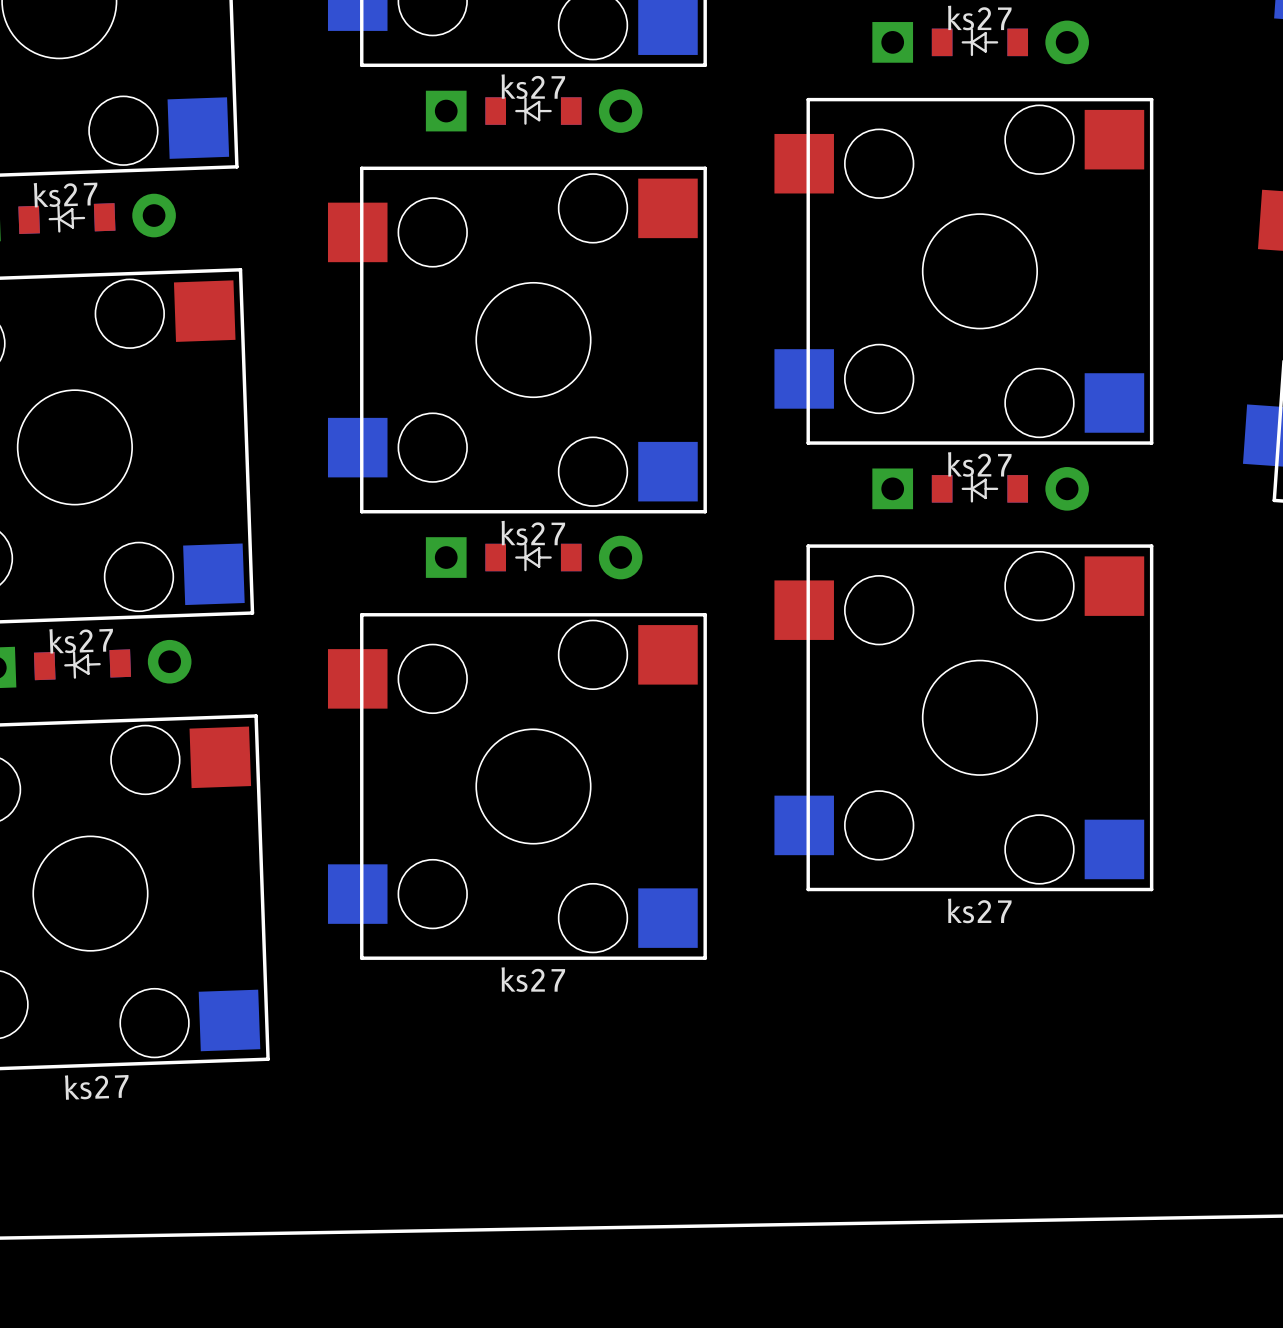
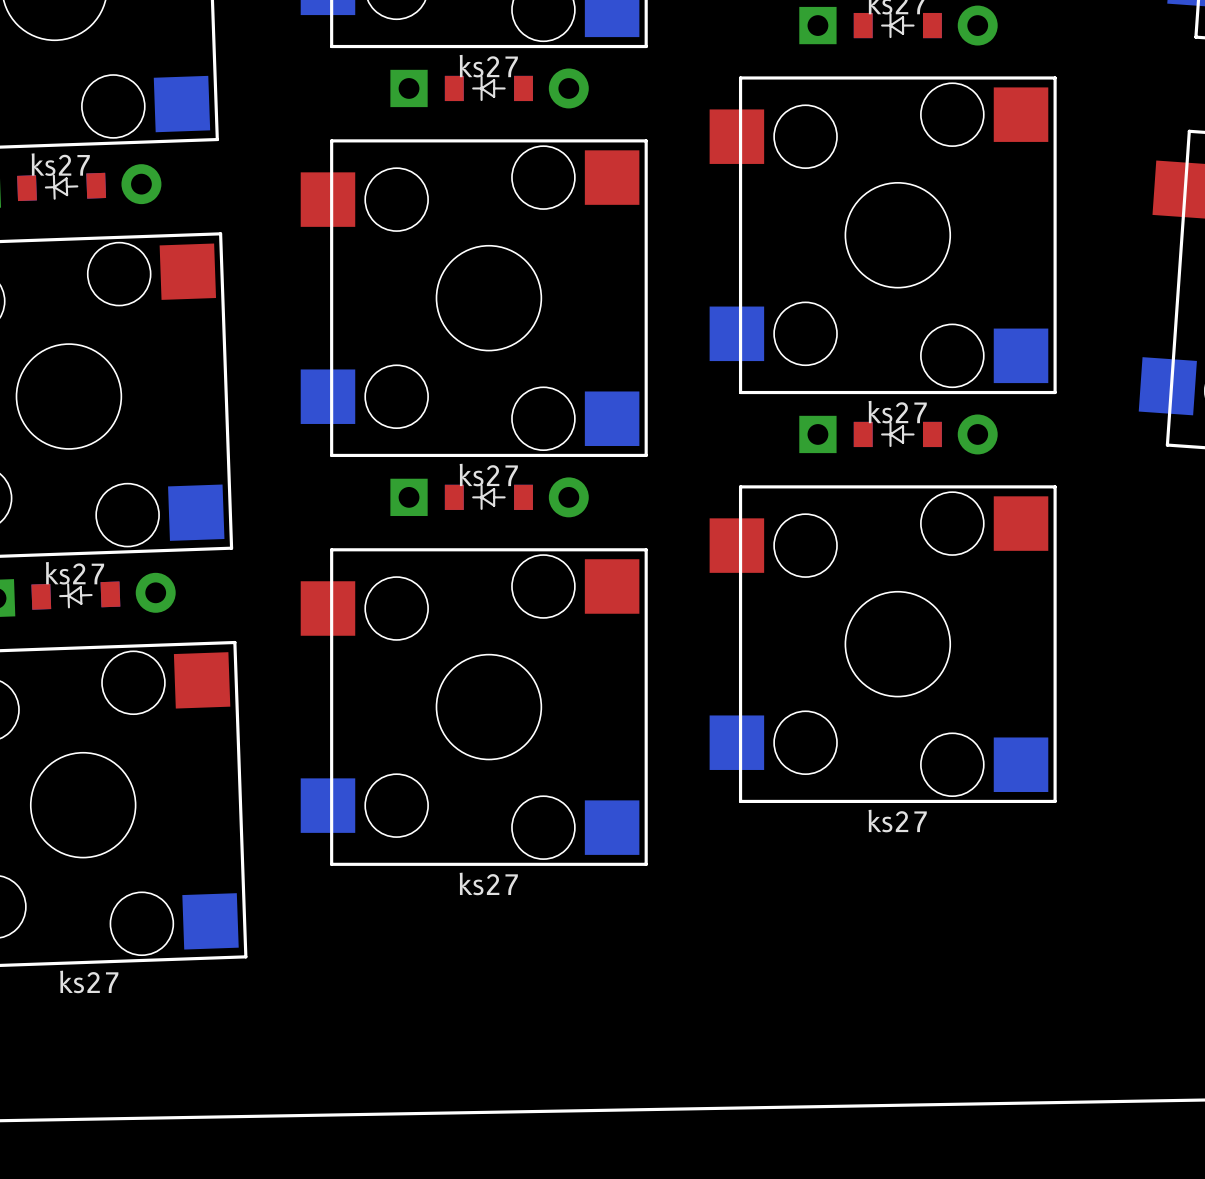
part value rotation: 0° (65, 194) -> 2° clockwise (60, 164)
part value rotation: 0° (81, 641) -> 2° clockwise (75, 573)
part value rotation: 0° (96, 1087) -> 2° clockwise (89, 981)

